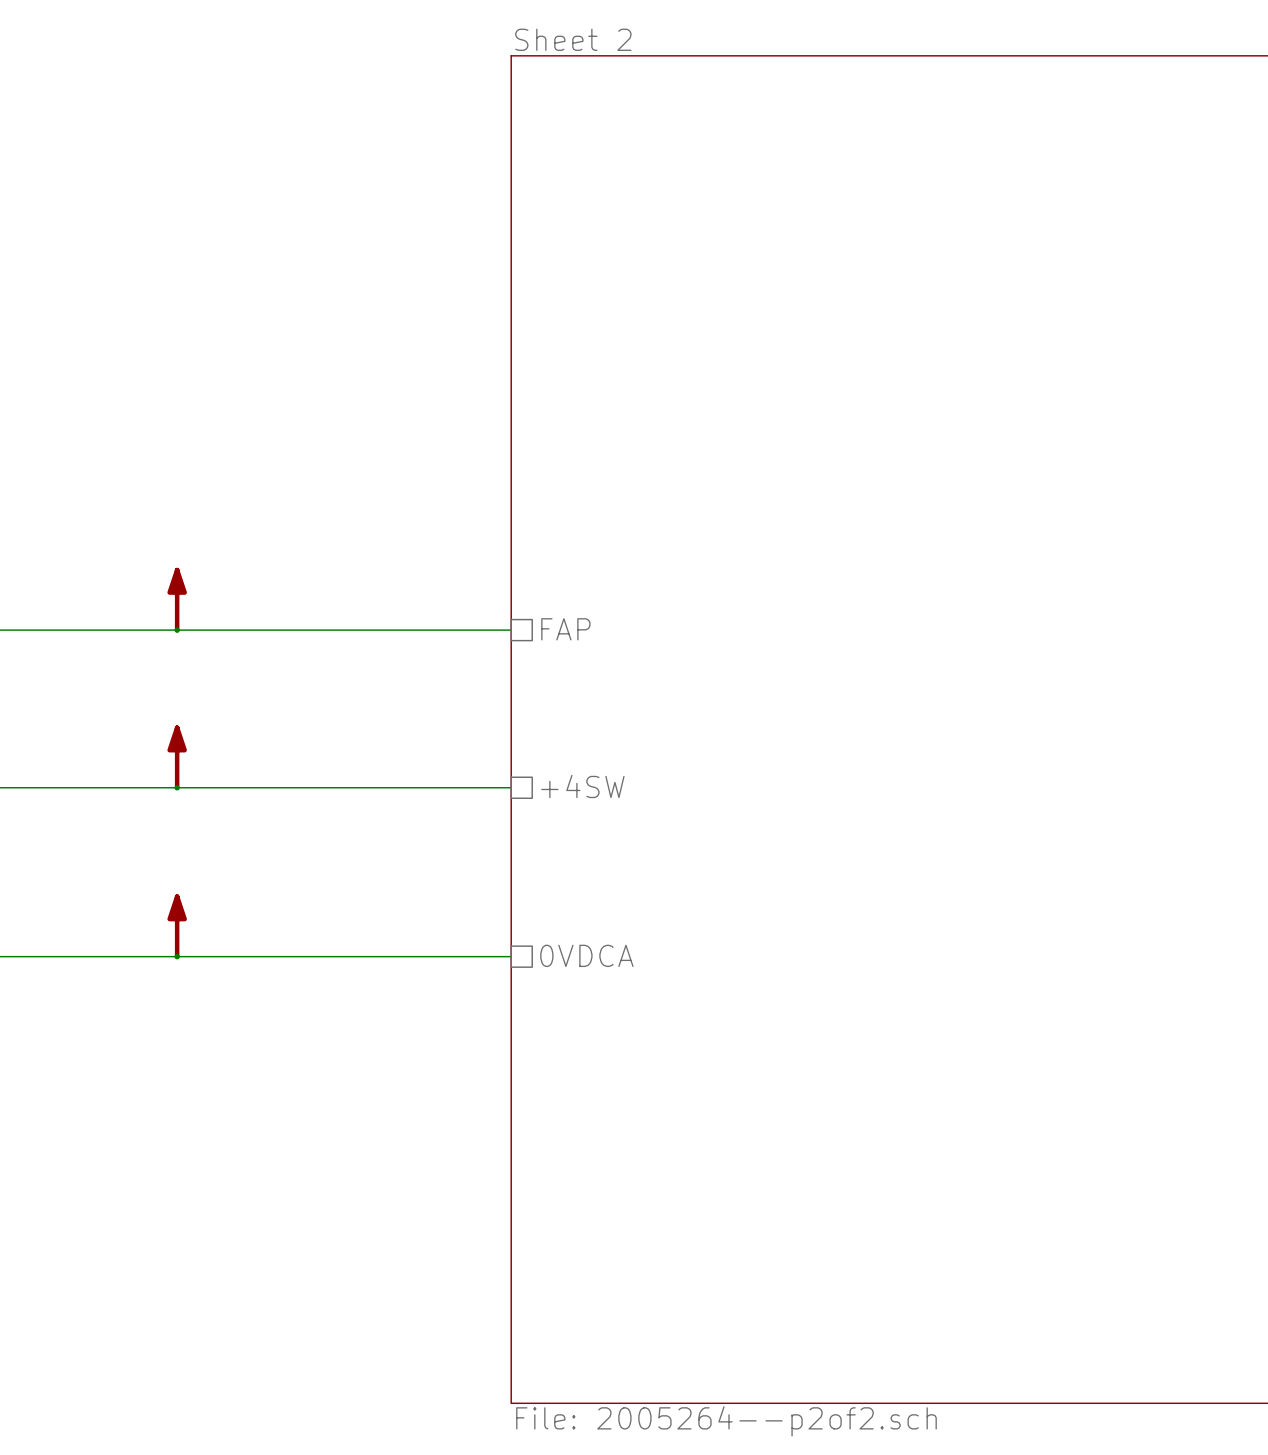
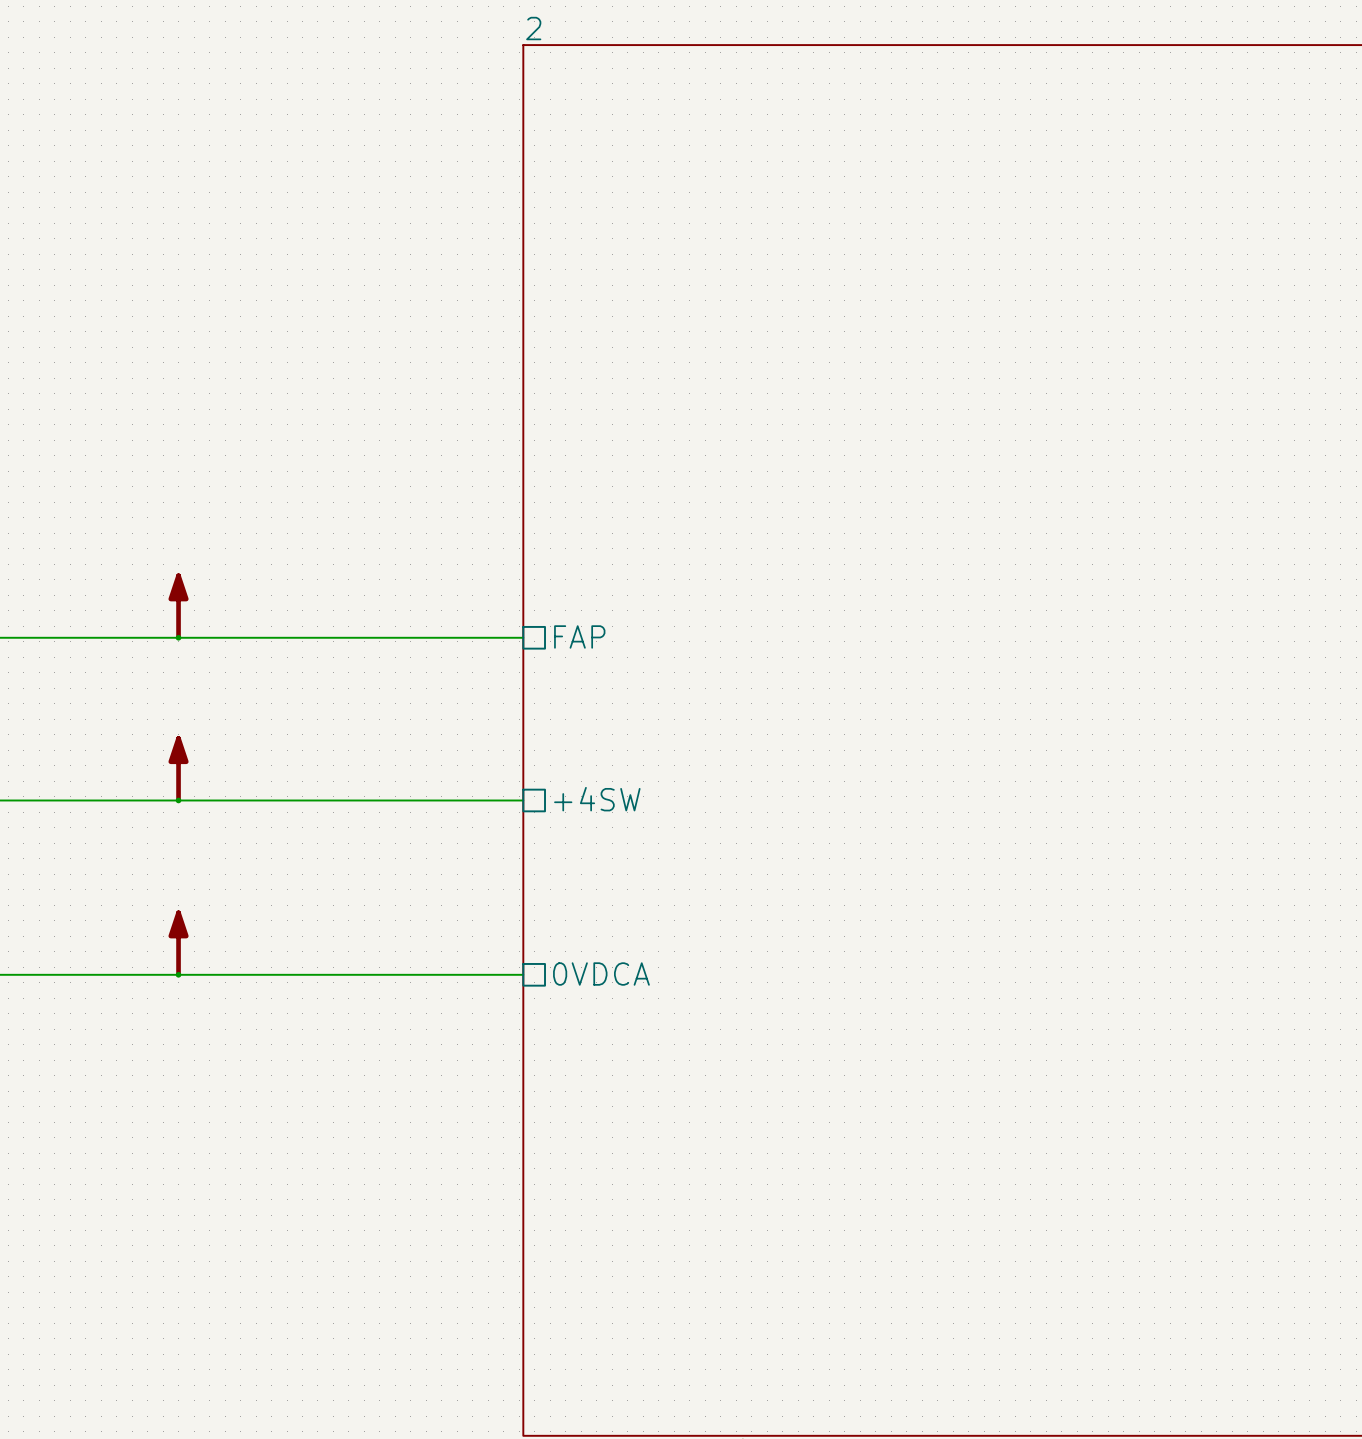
sheet Sheet 2 name: Sheet 2 (573, 39) -> 2 (533, 28)

